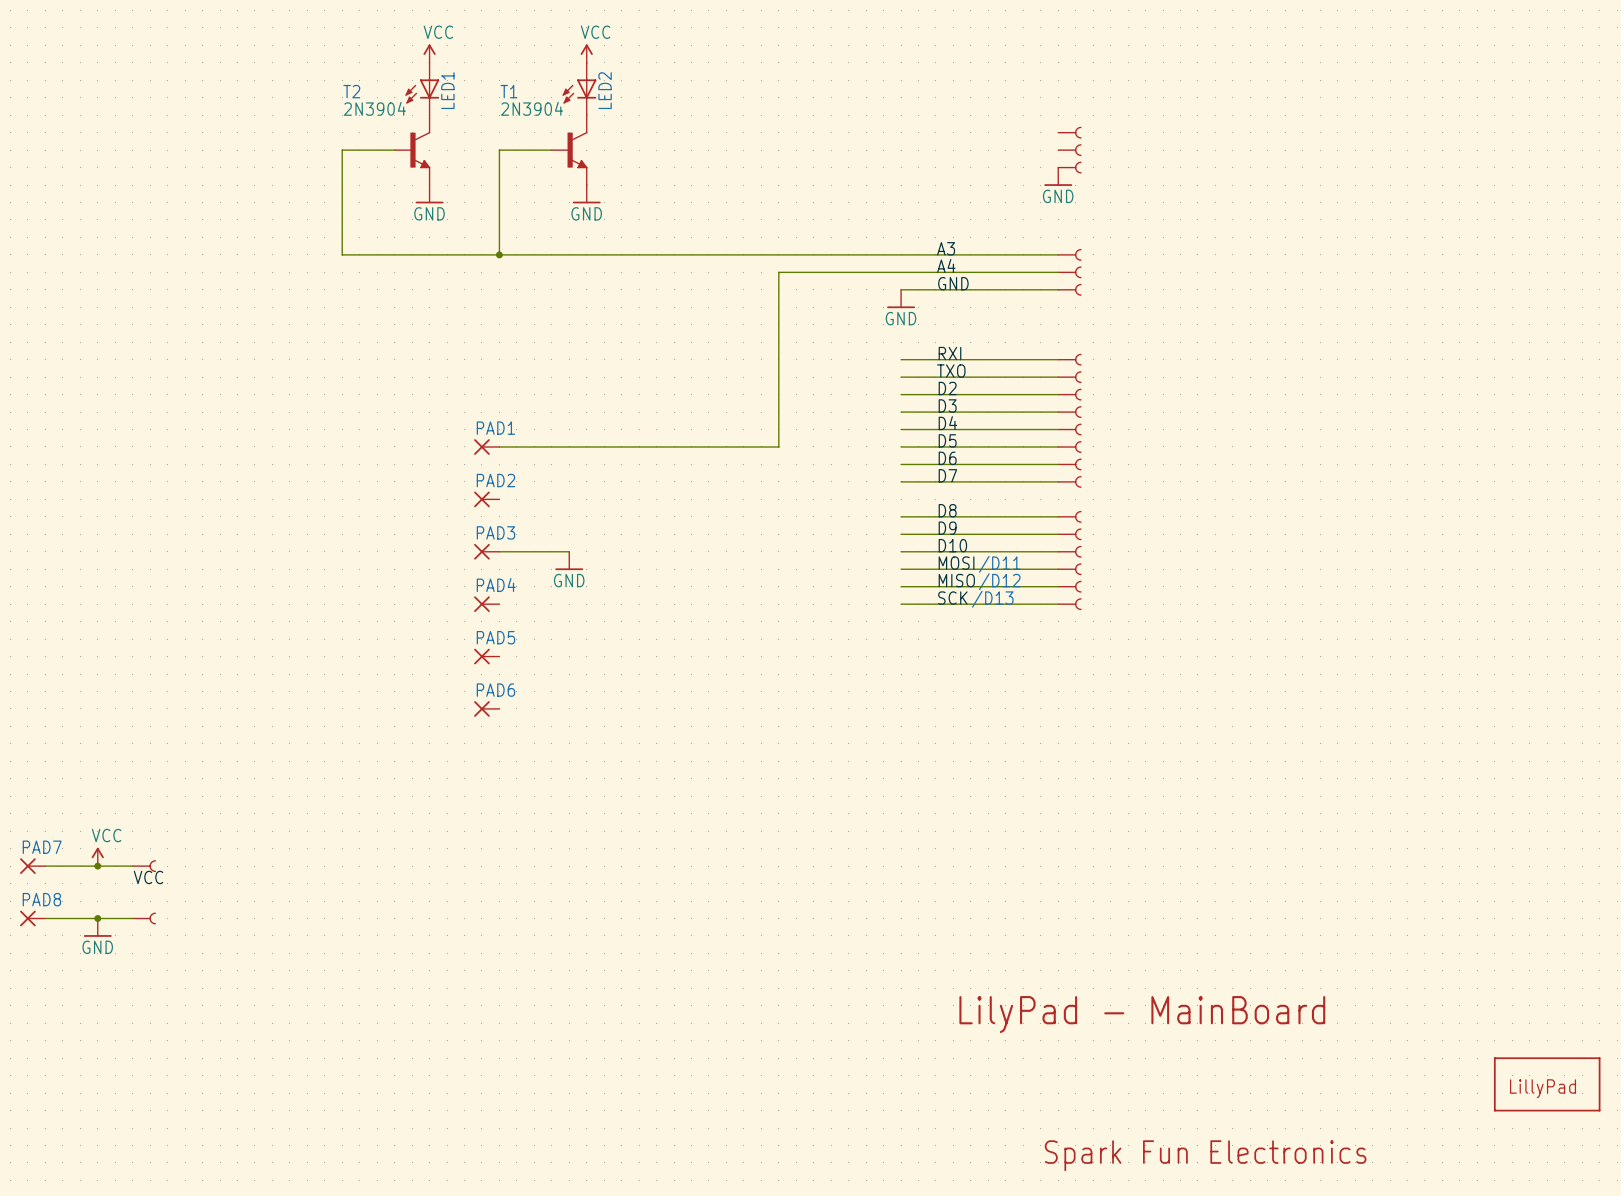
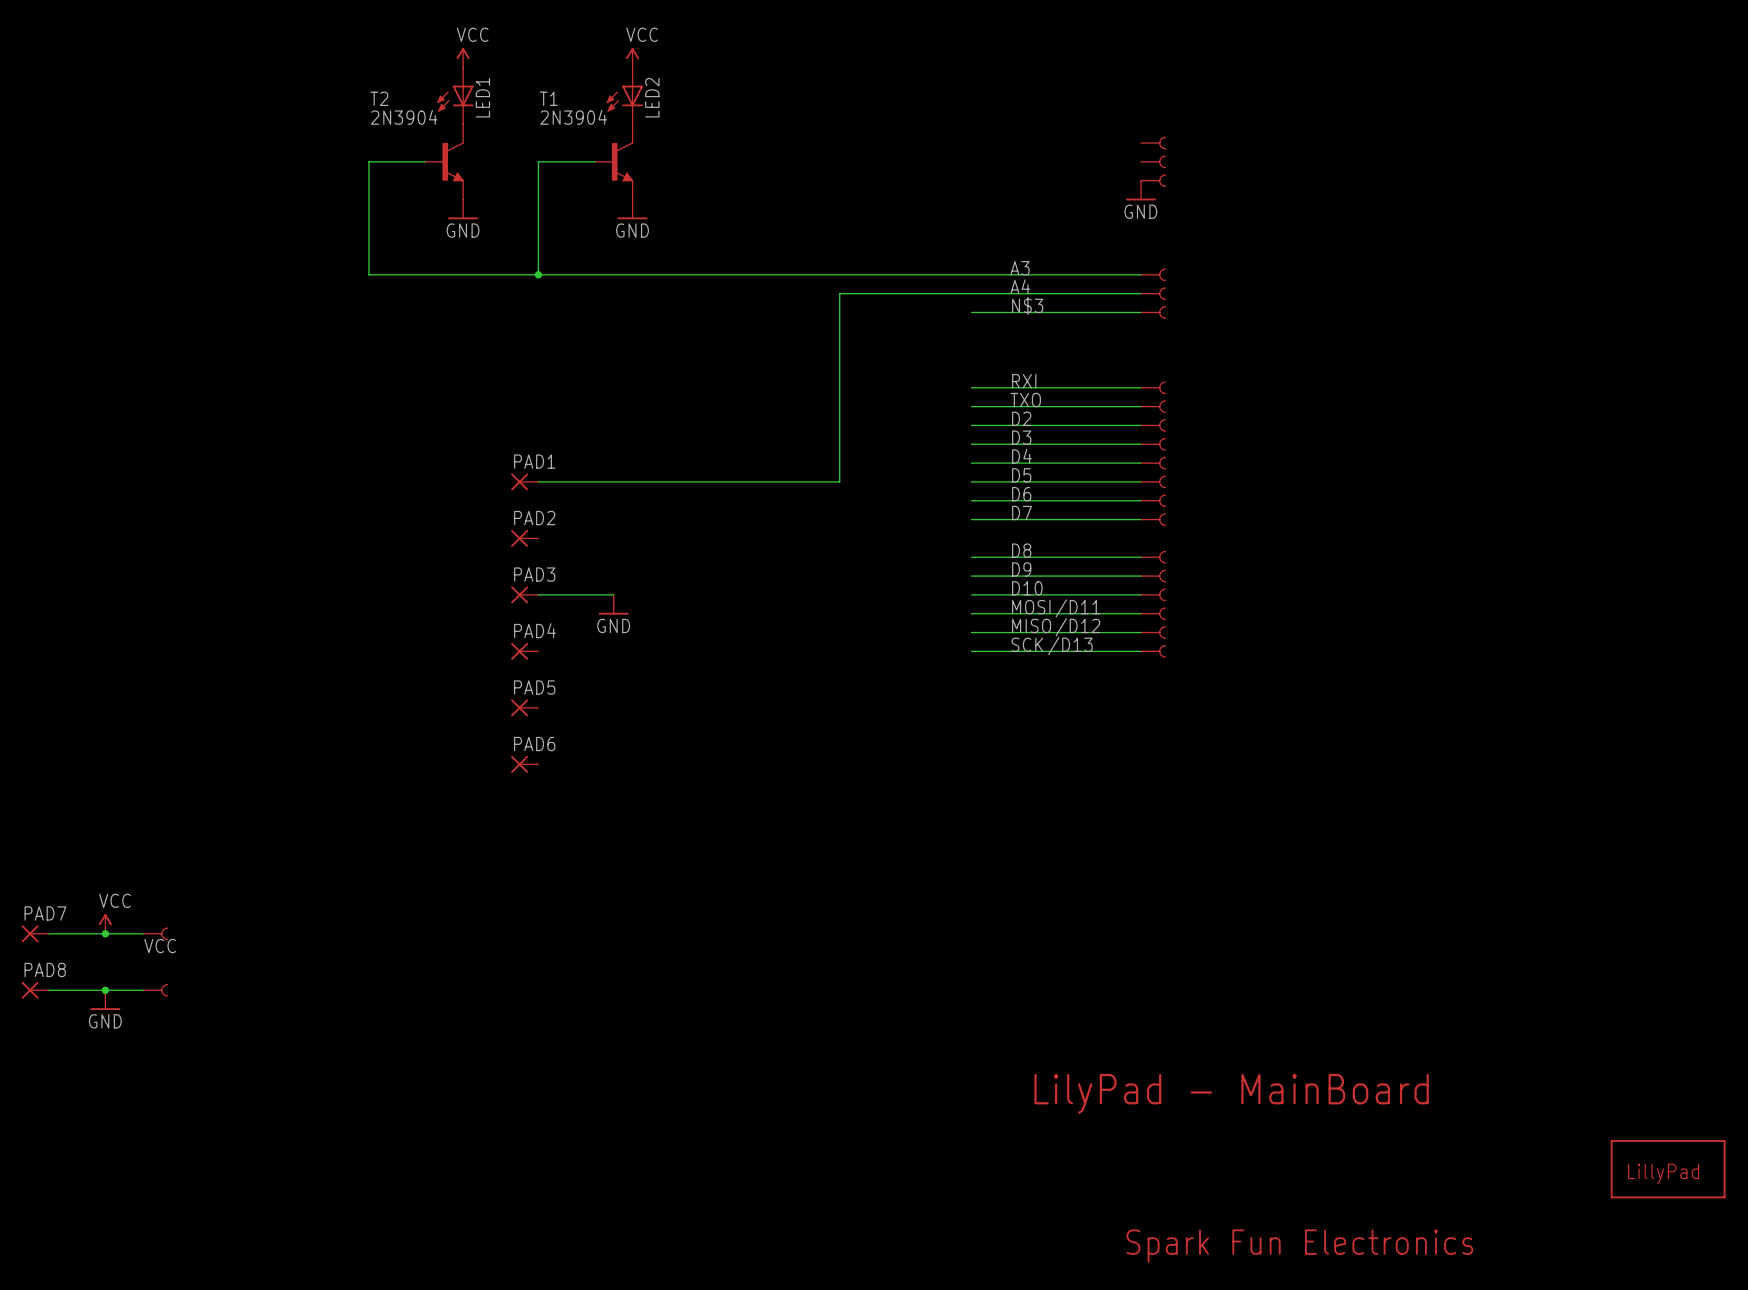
label: GND (953, 283) -> N$3 (1027, 305)
power symbol: GND (901, 298) -> none

